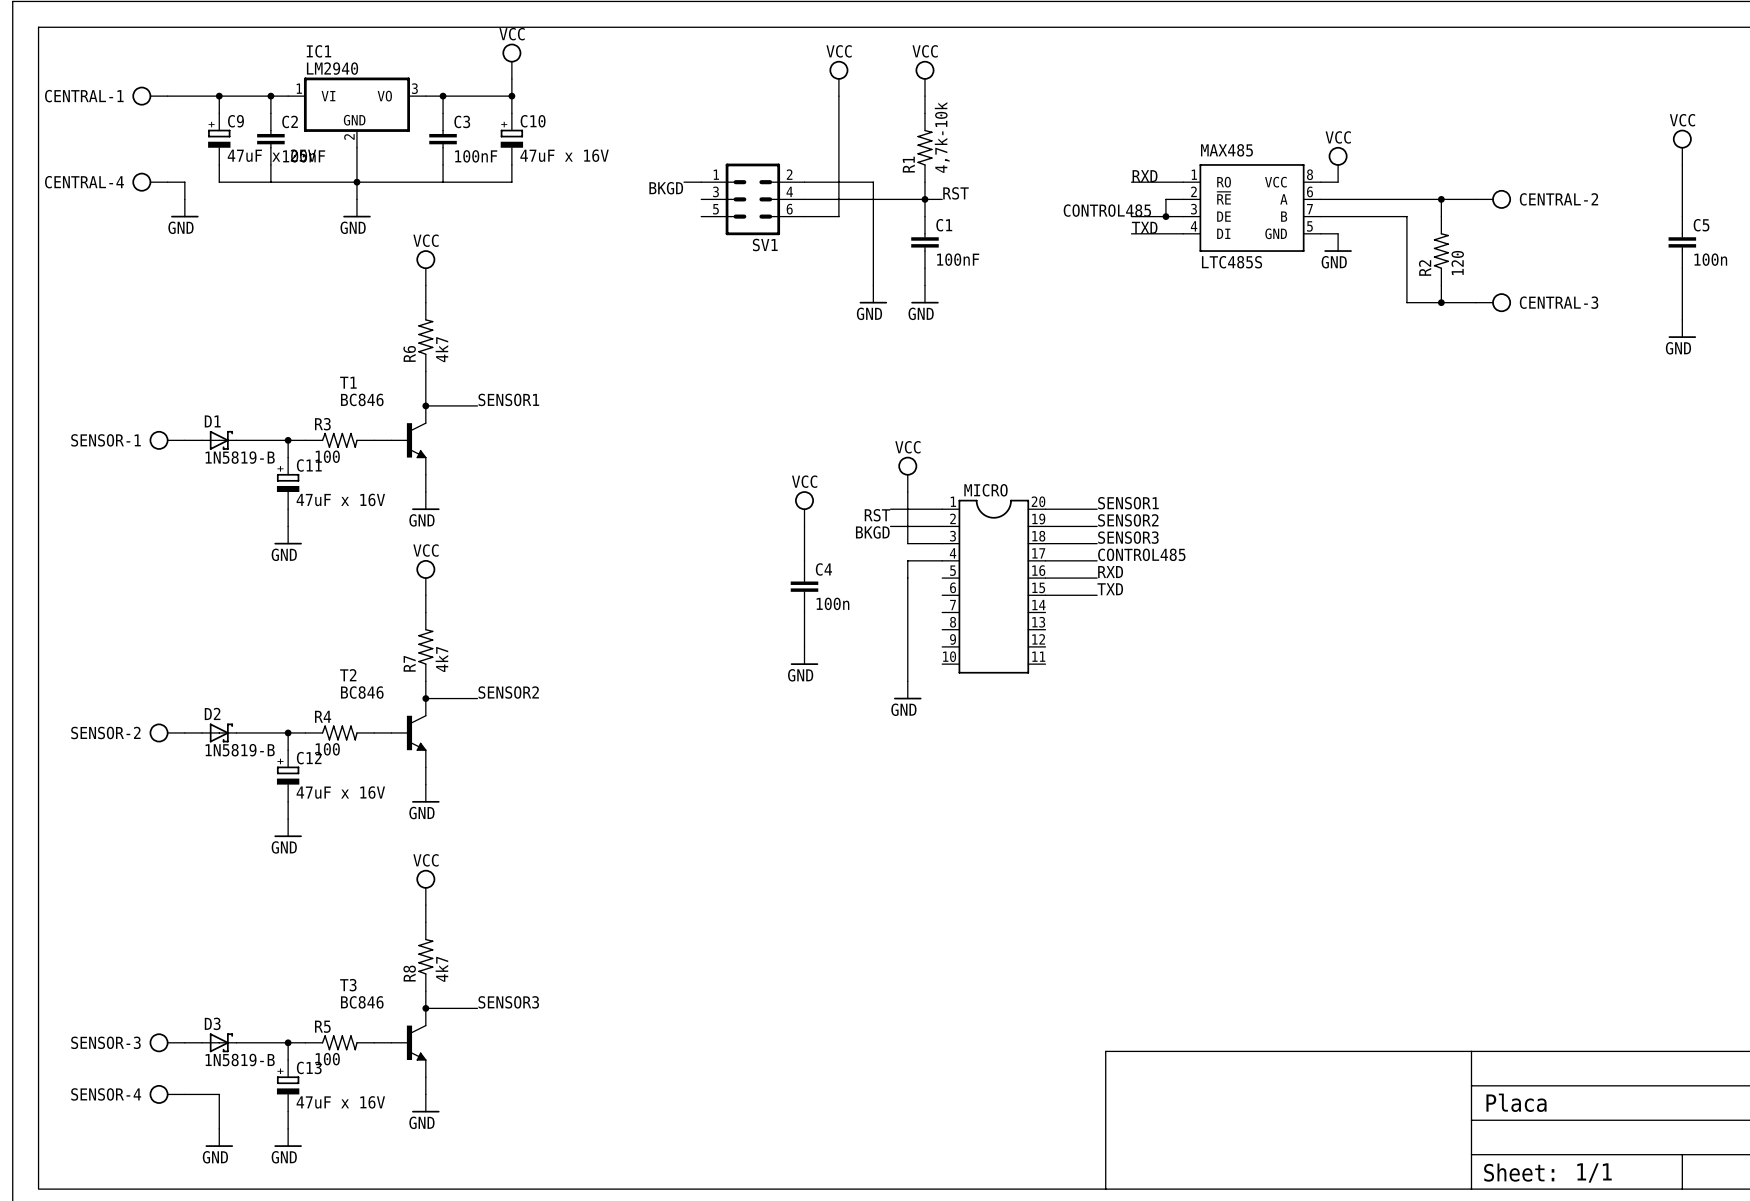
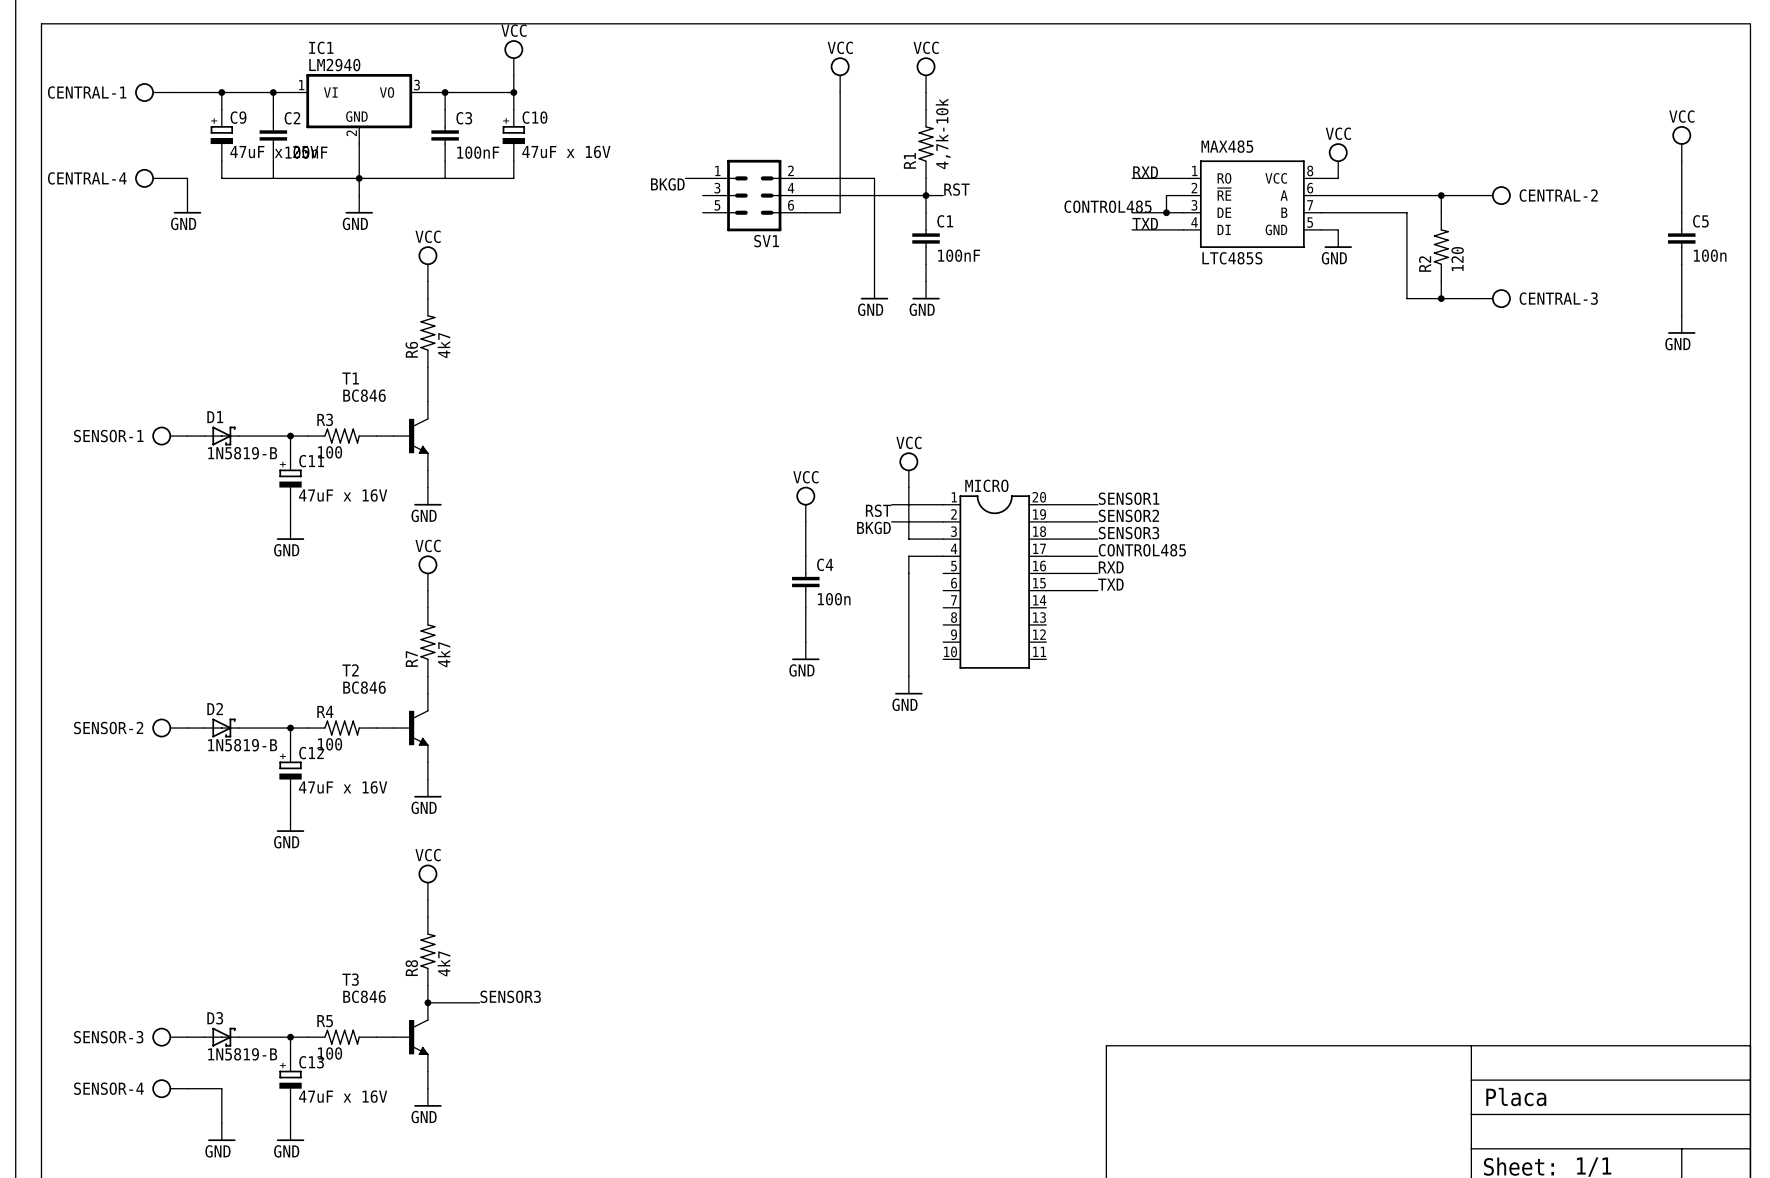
label: SENSOR1 (508, 399) -> none
wire: (425, 405) (477, 405) -> none
junction: (425, 405) -> none
label: SENSOR2 (508, 692) -> none
wire: (425, 698) (477, 698) -> none
junction: (425, 698) -> none

